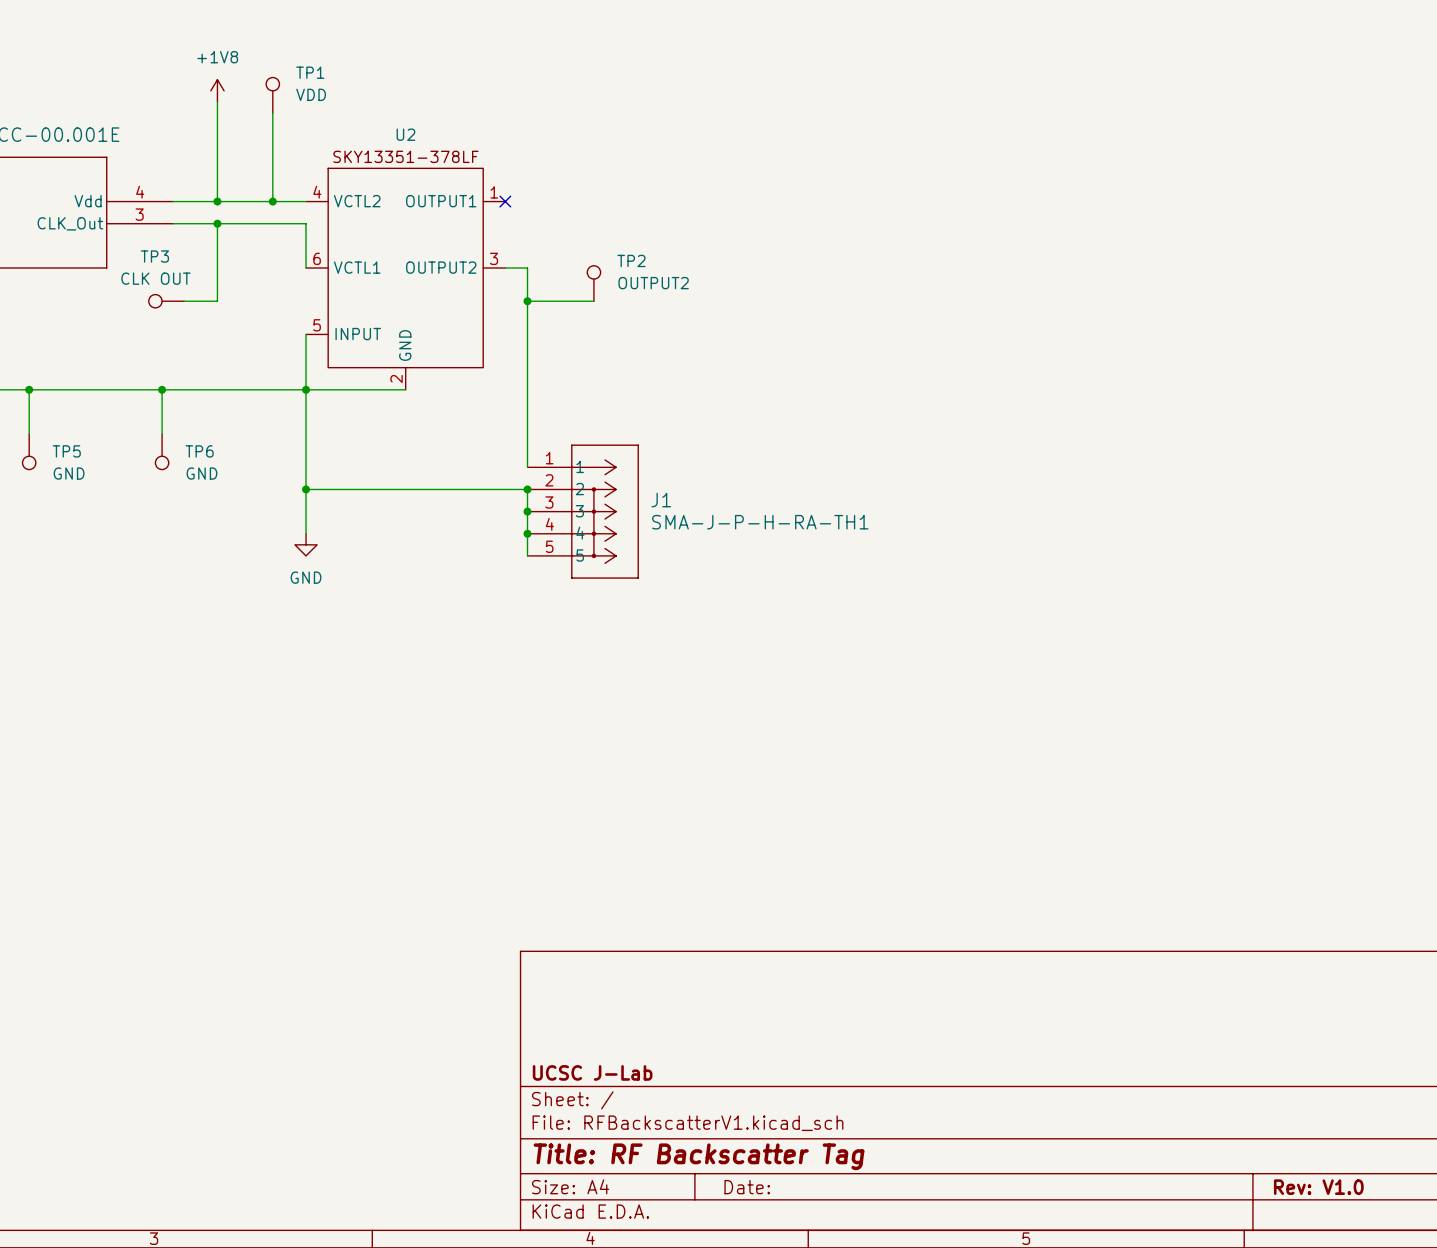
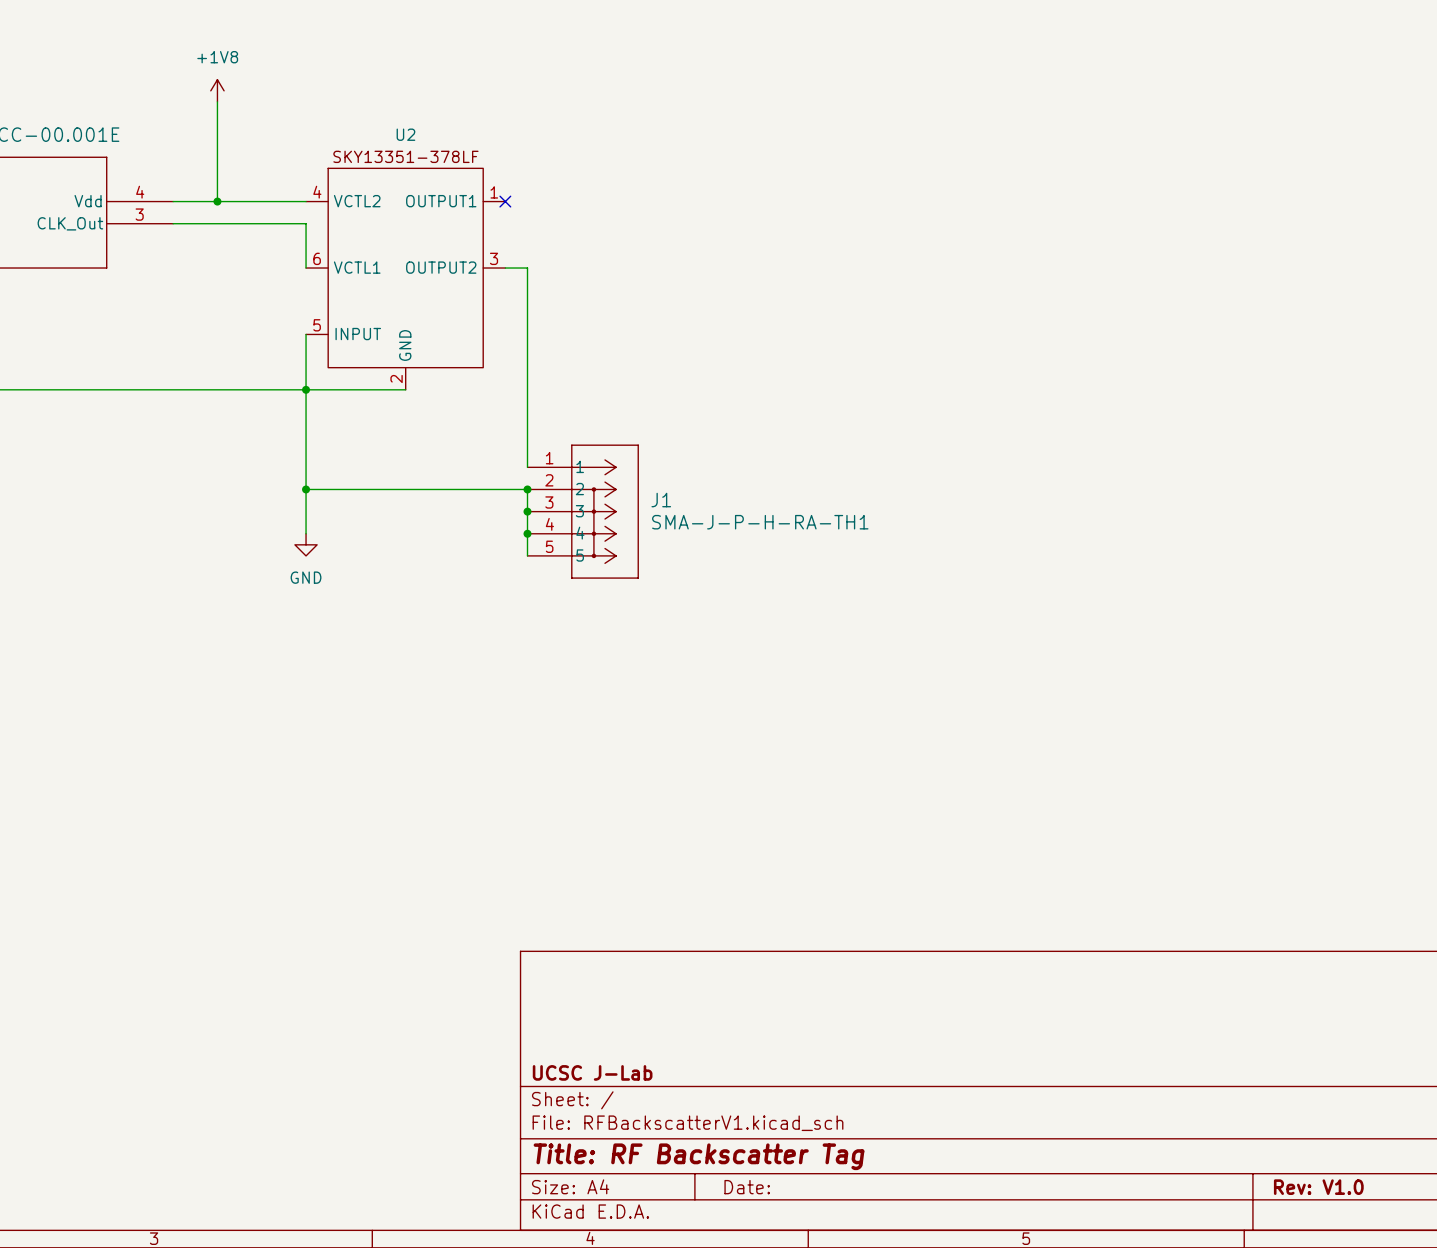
TP1: VDD (272, 95) -> none
wire: (272, 112) (272, 201) -> none
junction: (272, 201) -> none
wire: (217, 223) (217, 301) (184, 301) -> none
junction: (217, 223) -> none
TP2: OUTPUT2 (593, 283) -> none
TP3: CLK OUT (166, 301) -> none
wire: (527, 301) (593, 301) -> none
junction: (527, 301) -> none
wire: (29, 389) (29, 434) -> none
junction: (29, 389) -> none
wire: (162, 389) (162, 434) -> none
junction: (162, 389) -> none
TP5: GND (29, 451) -> none
TP6: GND (162, 451) -> none

